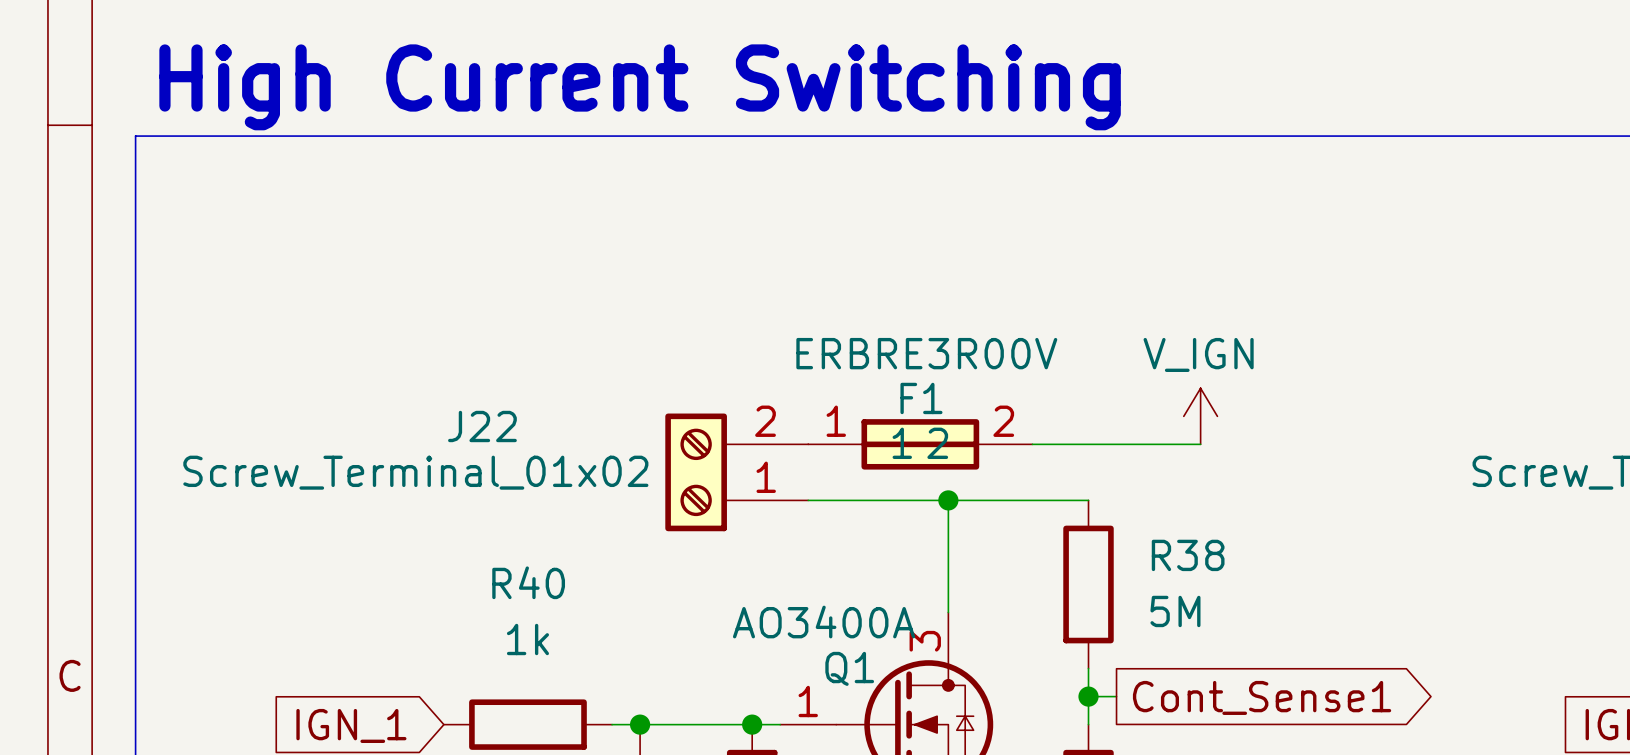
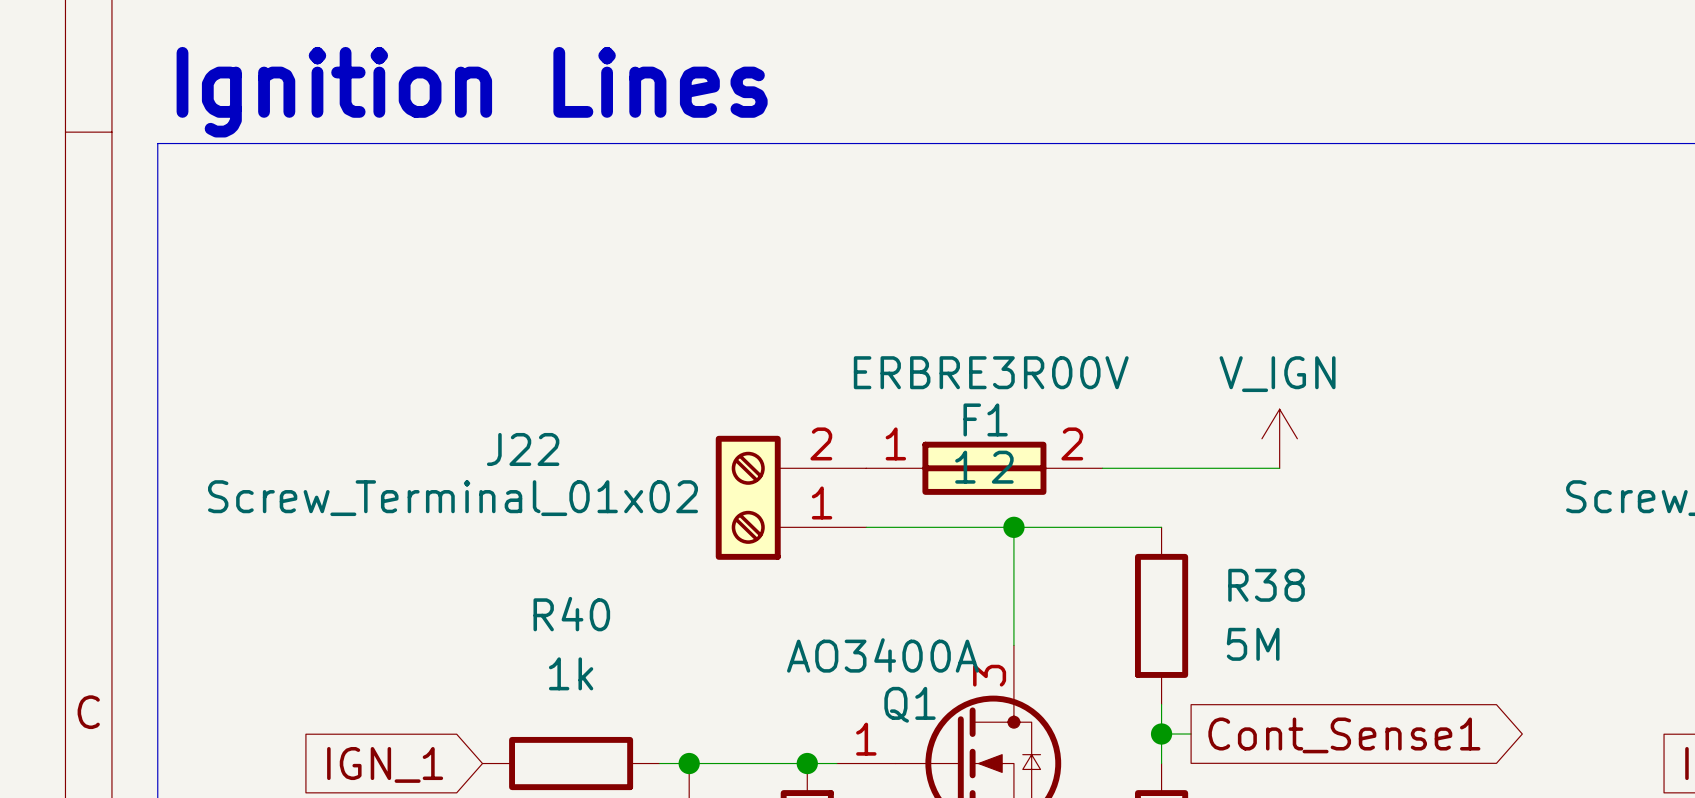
text: none -> Ignition Lines (472, 92)
text: High Current Switching (640, 87) -> none

